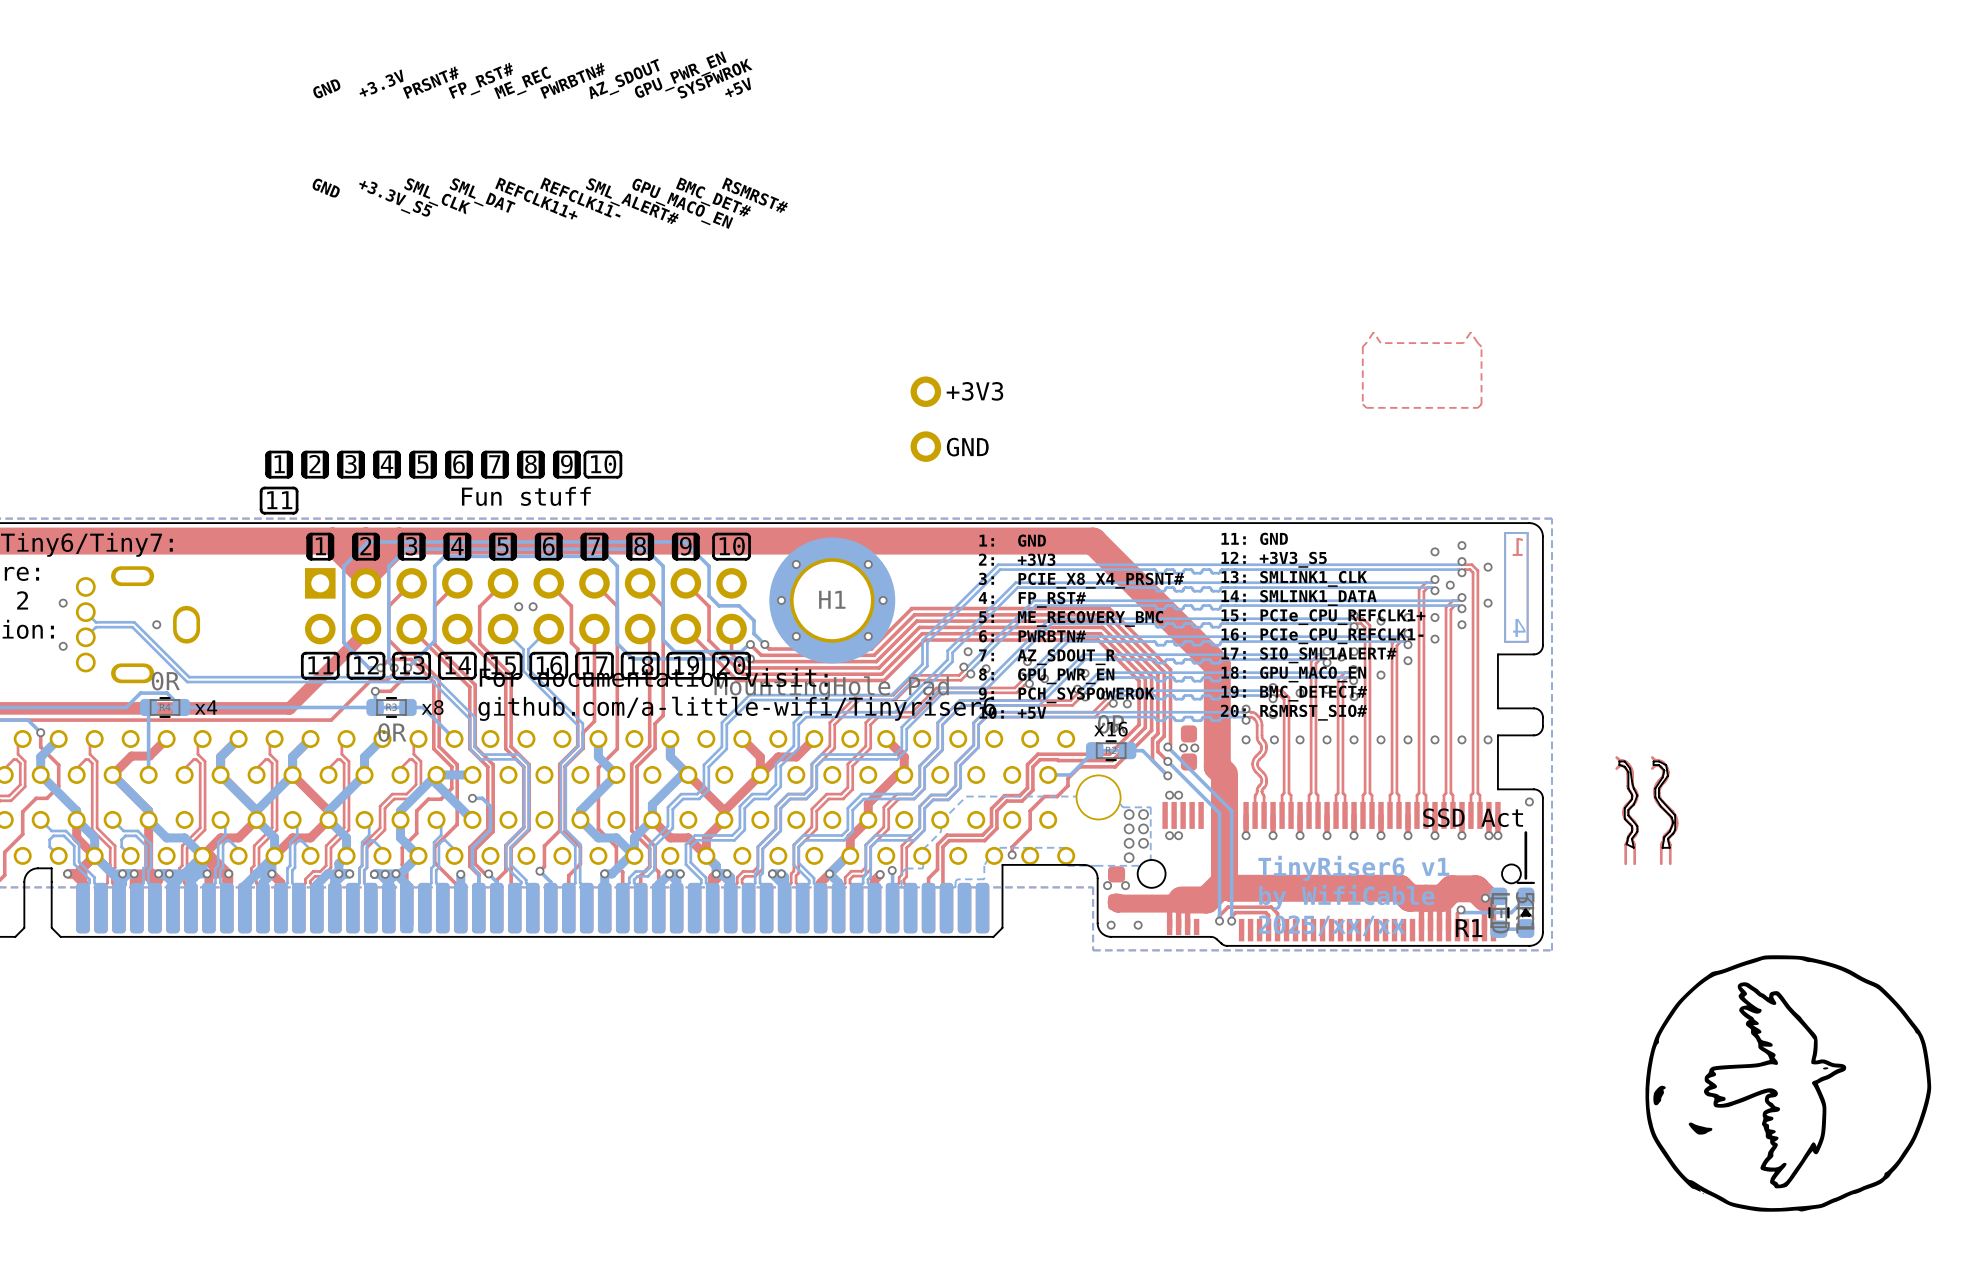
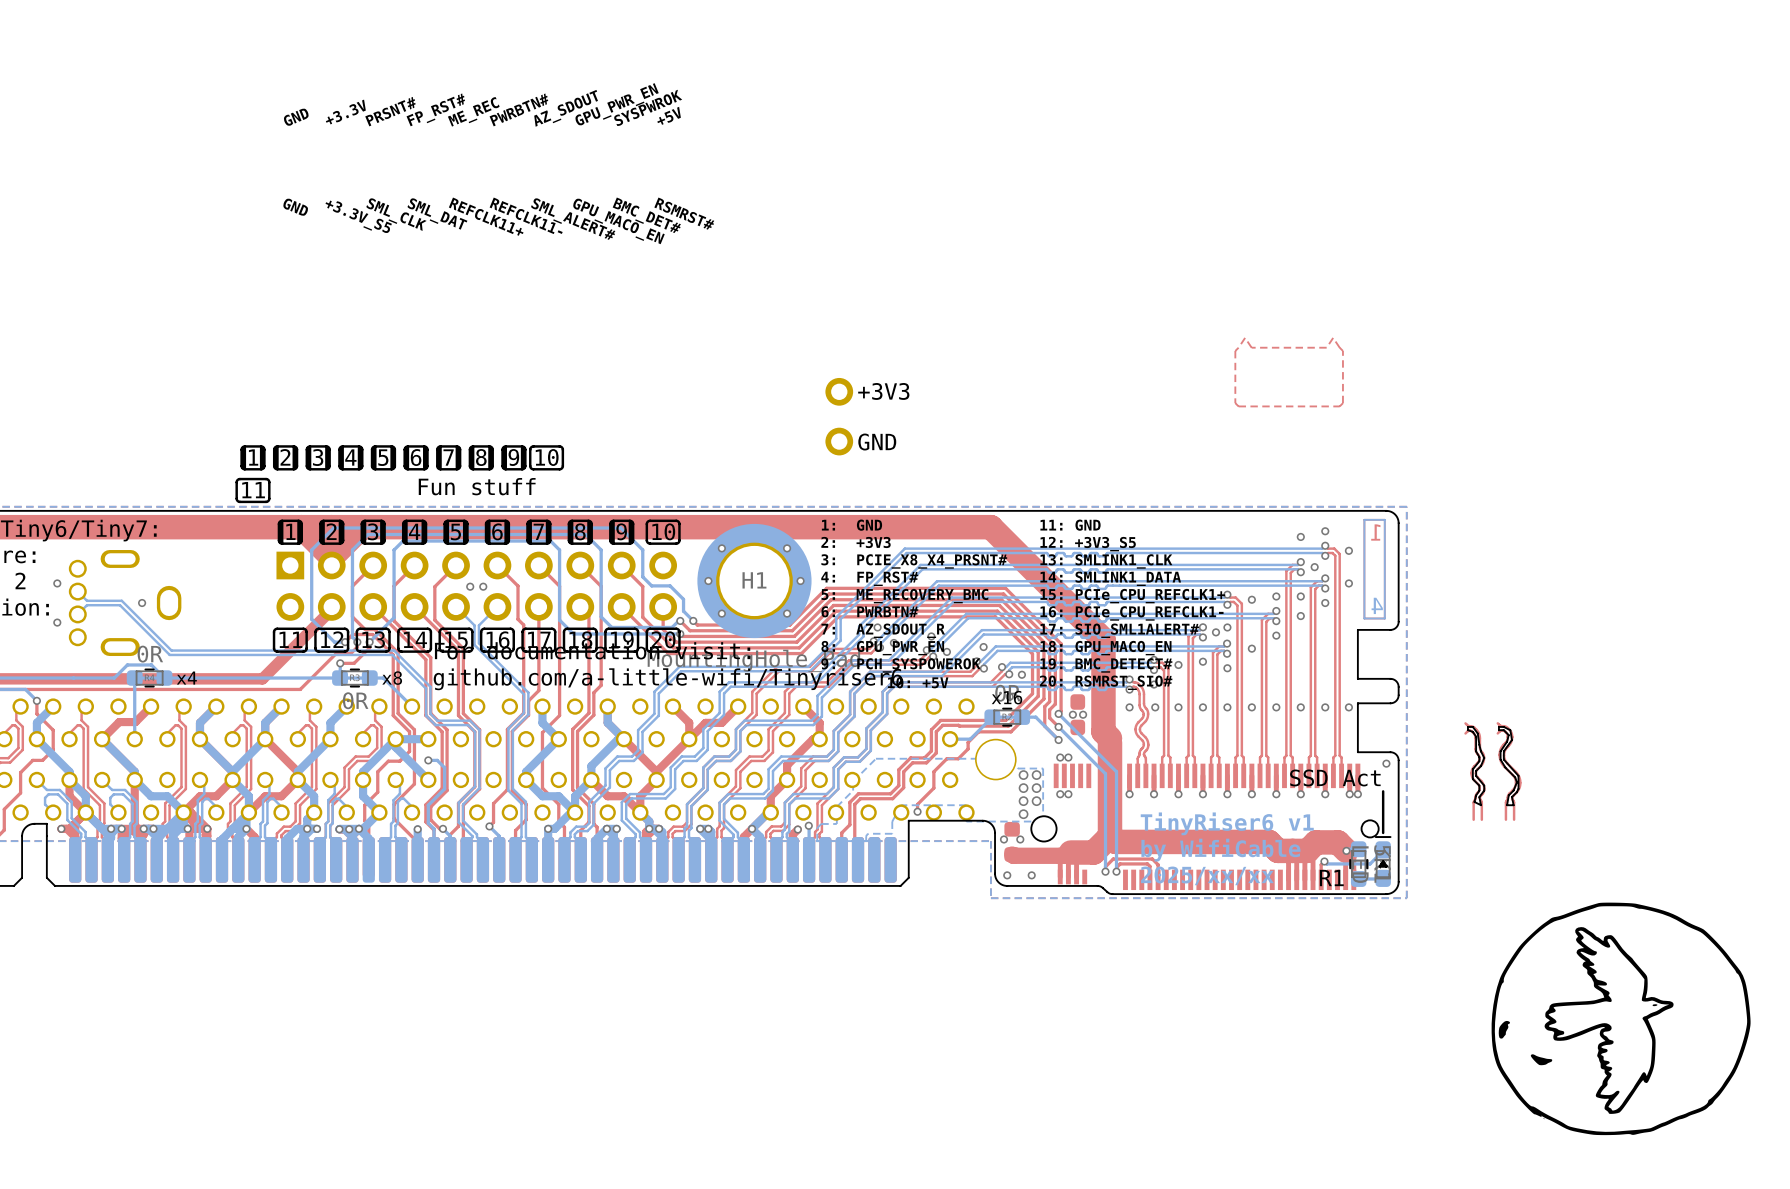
text position: 11: GND (1254, 538) -> 11: GND (1070, 525)
text position: 1: GND (1012, 540) -> 1: GND (851, 525)
text position: 2: +3V3 (1017, 559) -> 2: +3V3 (856, 542)
text position: 12: +3V3_S5 (1274, 559) -> 12: +3V3_S5 (1088, 544)
text position: 13: SMLINK1_CLK (1294, 578) -> 13: SMLINK1_CLK (1106, 561)
text position: 3: PCIE_X8_X4_PRSNT# (1081, 580) -> 3: PCIE_X8_X4_PRSNT# (914, 561)
text position: 14: SMLINK1_DATA (1299, 598) -> 14: SMLINK1_DATA (1110, 578)
text position: 4: FP_RST# (1032, 599) -> 4: FP_RST# (869, 578)
text position: 15: PCIe_CPU_REFCLK1+ (1323, 617) -> 15: PCIe_CPU_REFCLK1+ (1132, 596)
text position: 5: ME_RECOVERY_BMC (1071, 618) -> 5: ME_RECOVERY_BMC (904, 596)
text position: 6: PWRBTN# (1032, 636) -> 6: PWRBTN# (869, 611)
text position: 16: PCIe_CPU_REFCLK1- (1322, 636) -> 16: PCIe_CPU_REFCLK1- (1131, 613)
text position: 17: SIO_SML1ALERT# (1308, 655) -> 17: SIO_SML1ALERT# (1119, 630)
text position: 7: AZ_SDOUT_R (1047, 657) -> 7: AZ_SDOUT_R (883, 630)
text position: 18: GPU_MACO_EN (1293, 674) -> 18: GPU_MACO_EN (1105, 648)
text position: 8: GPU_PWR_EN (1046, 676) -> 8: GPU_PWR_EN (882, 648)
text position: 19: BMC_DETECT# (1294, 693) -> 19: BMC_DETECT# (1106, 665)
text position: 9: PCH_SYSPOWEROK (1066, 695) -> 9: PCH_SYSPOWEROK (900, 665)
text position: 20: RSMRST_SIO# (1293, 712) -> 20: RSMRST_SIO# (1106, 682)

